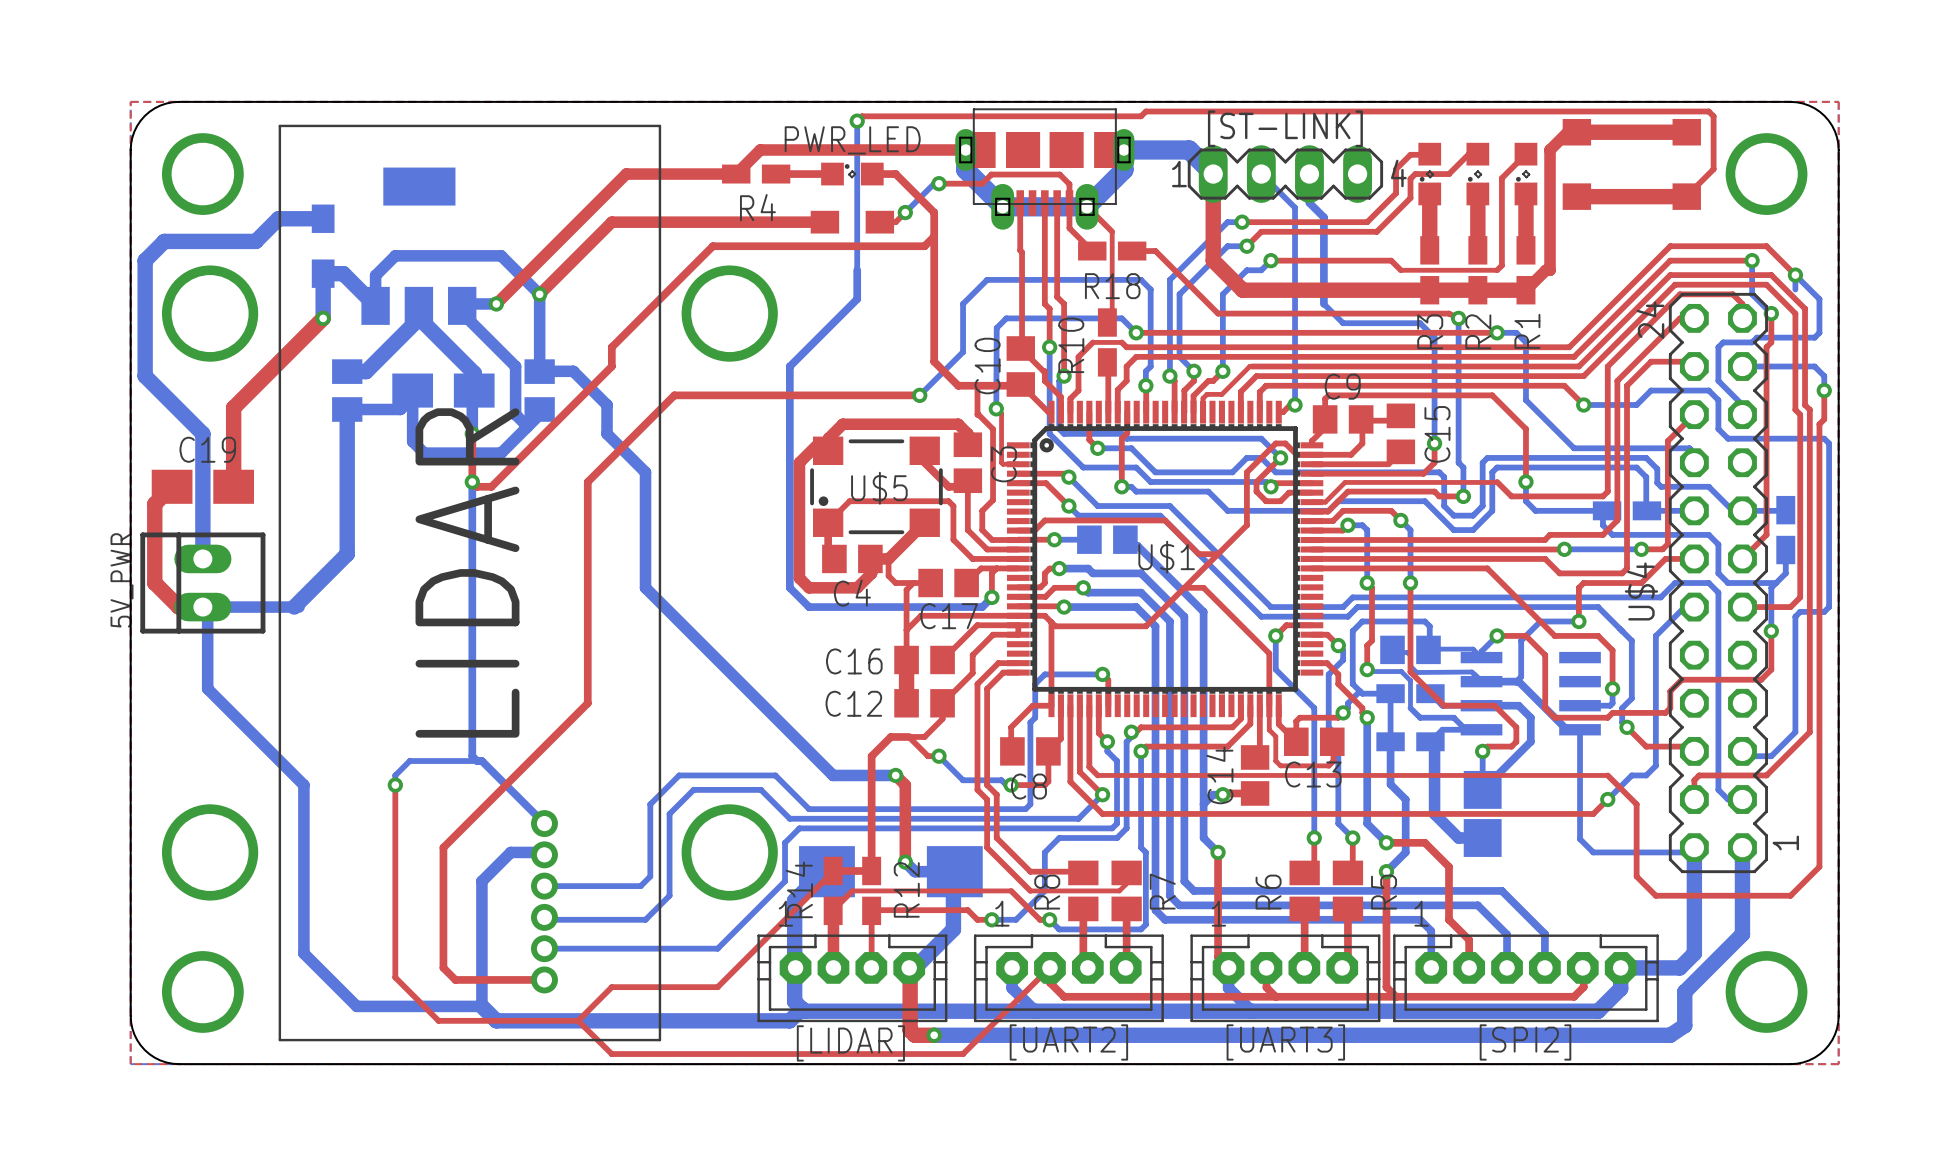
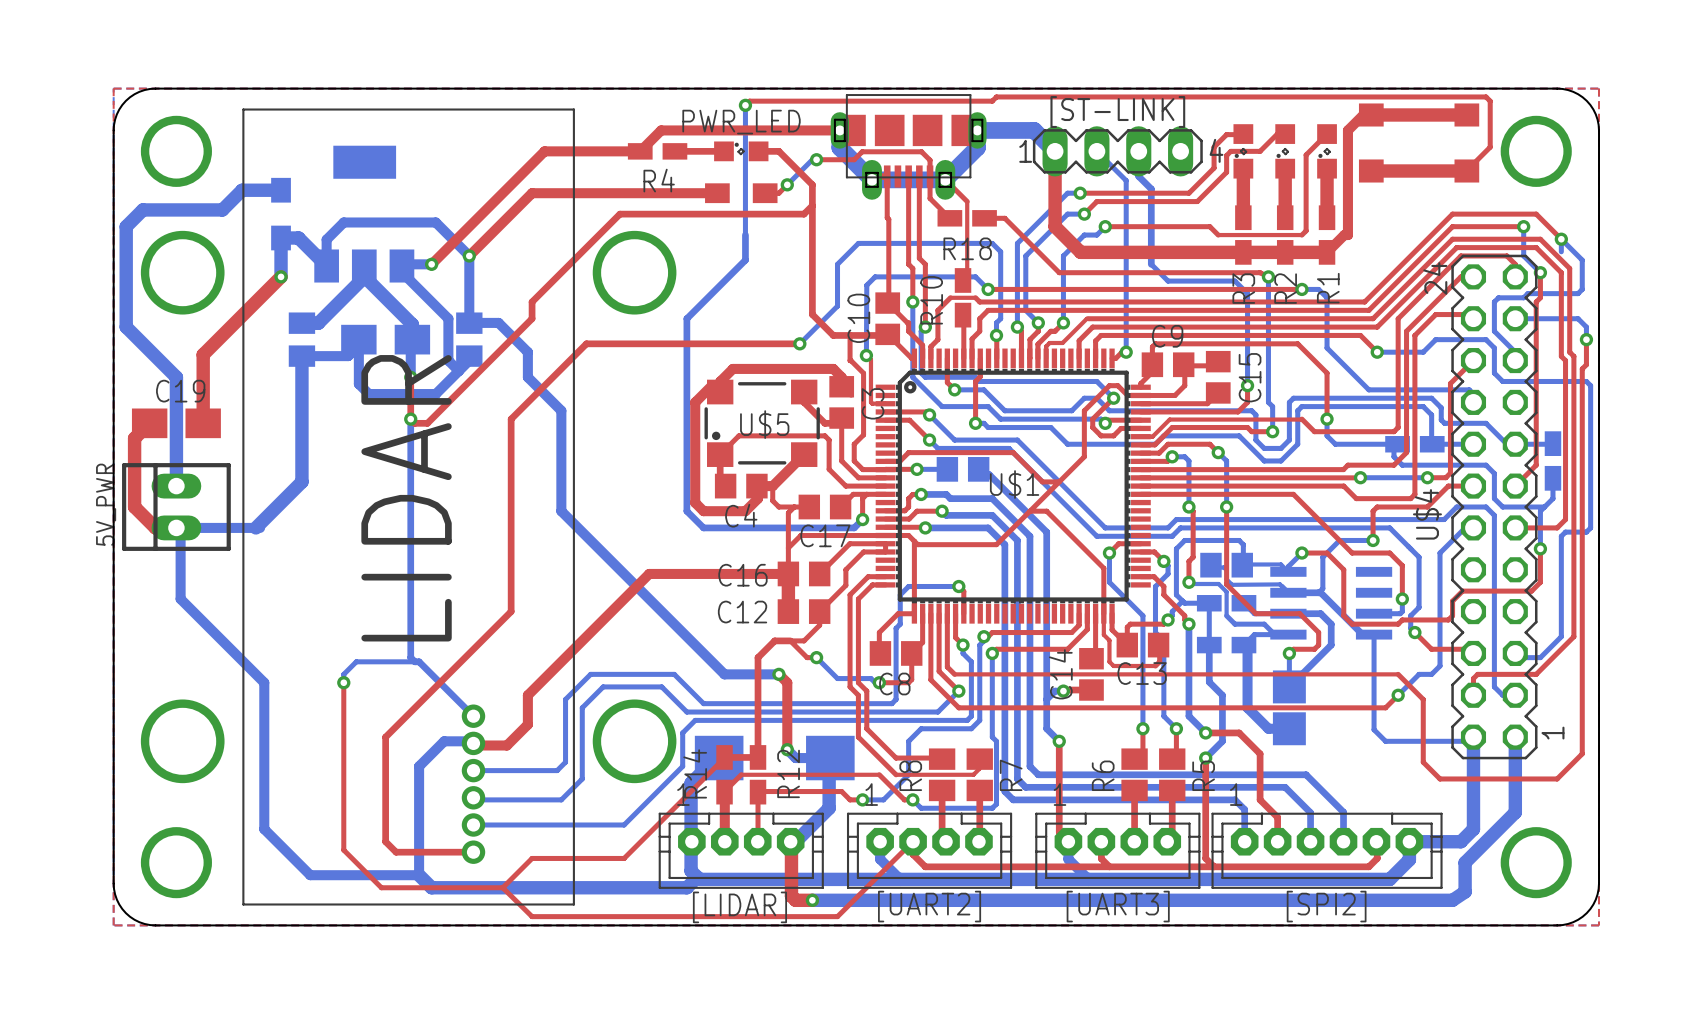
top track: none -> (788, 573) (649, 573) (527, 695) (527, 724) (506, 745) (473, 745) (473, 743)

